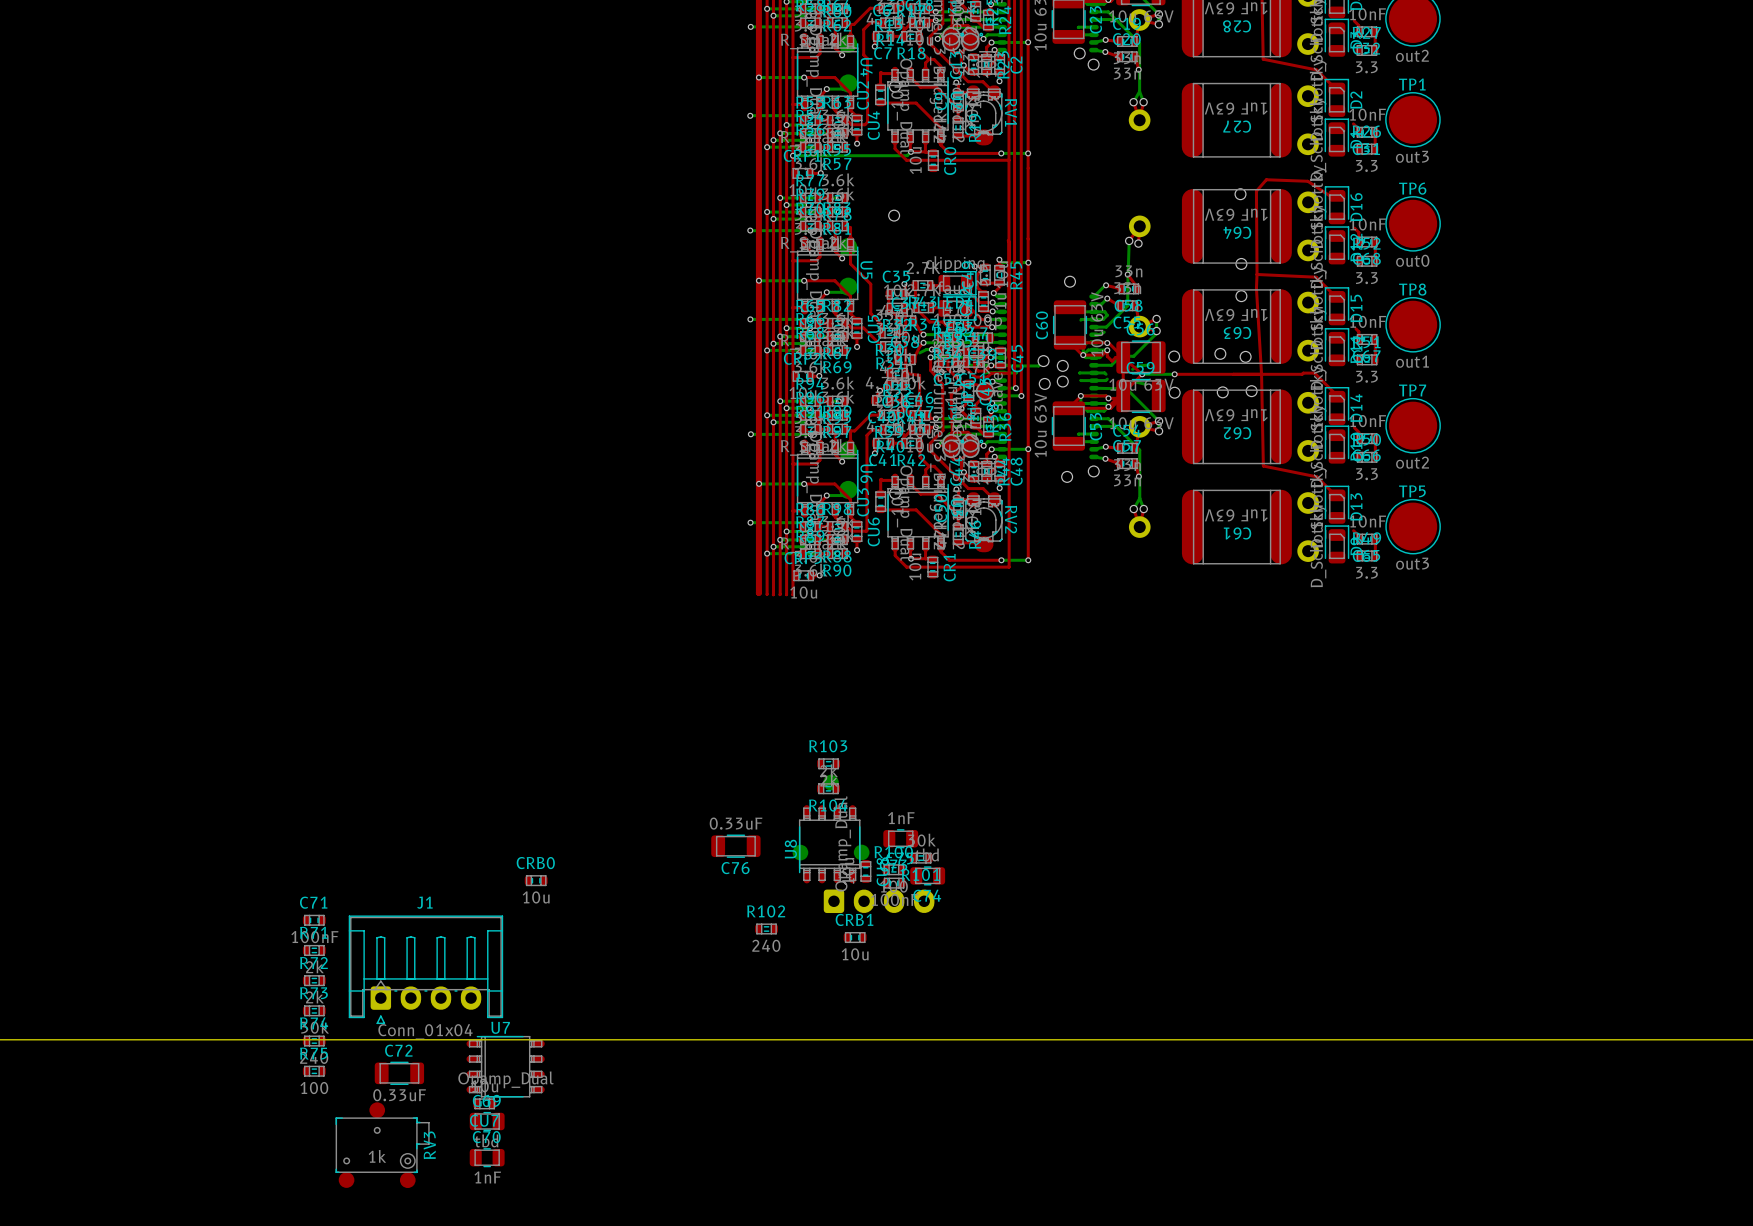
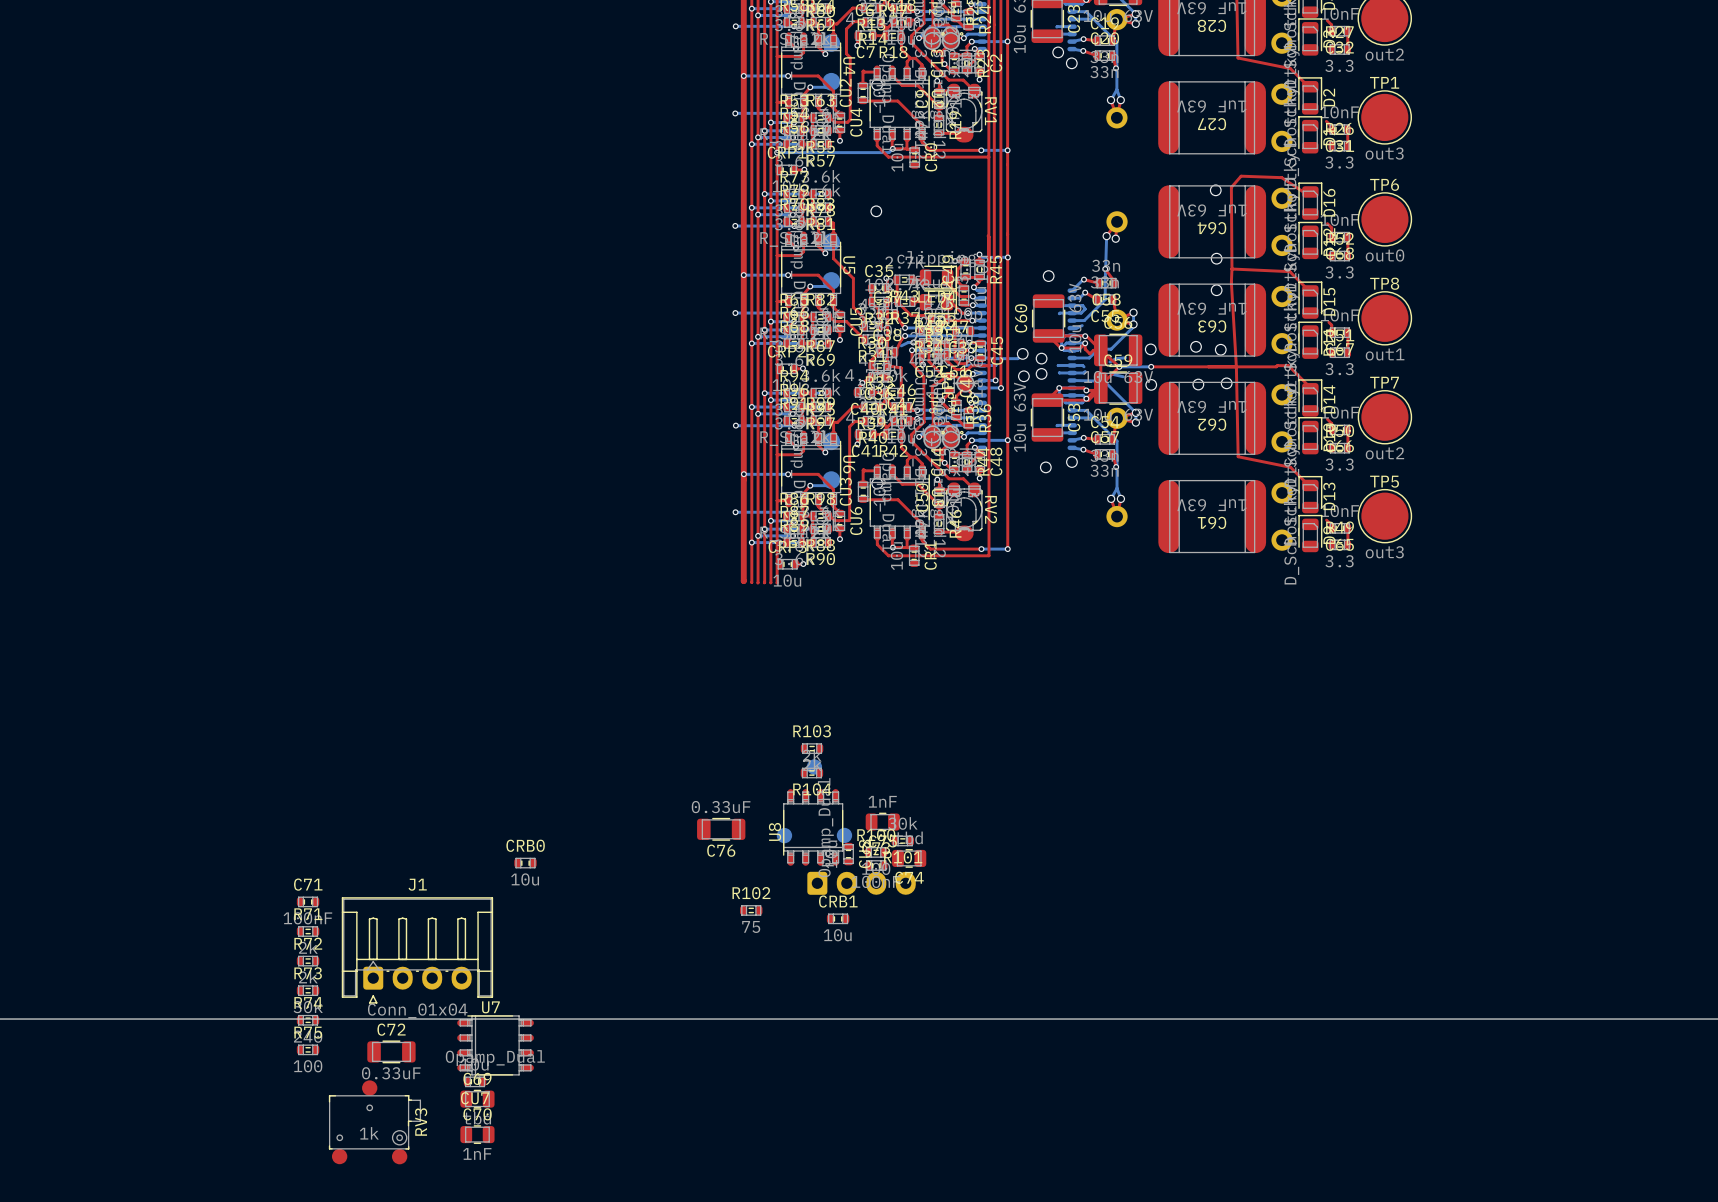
R102 value: 240 (766, 945) -> 75 (751, 926)

